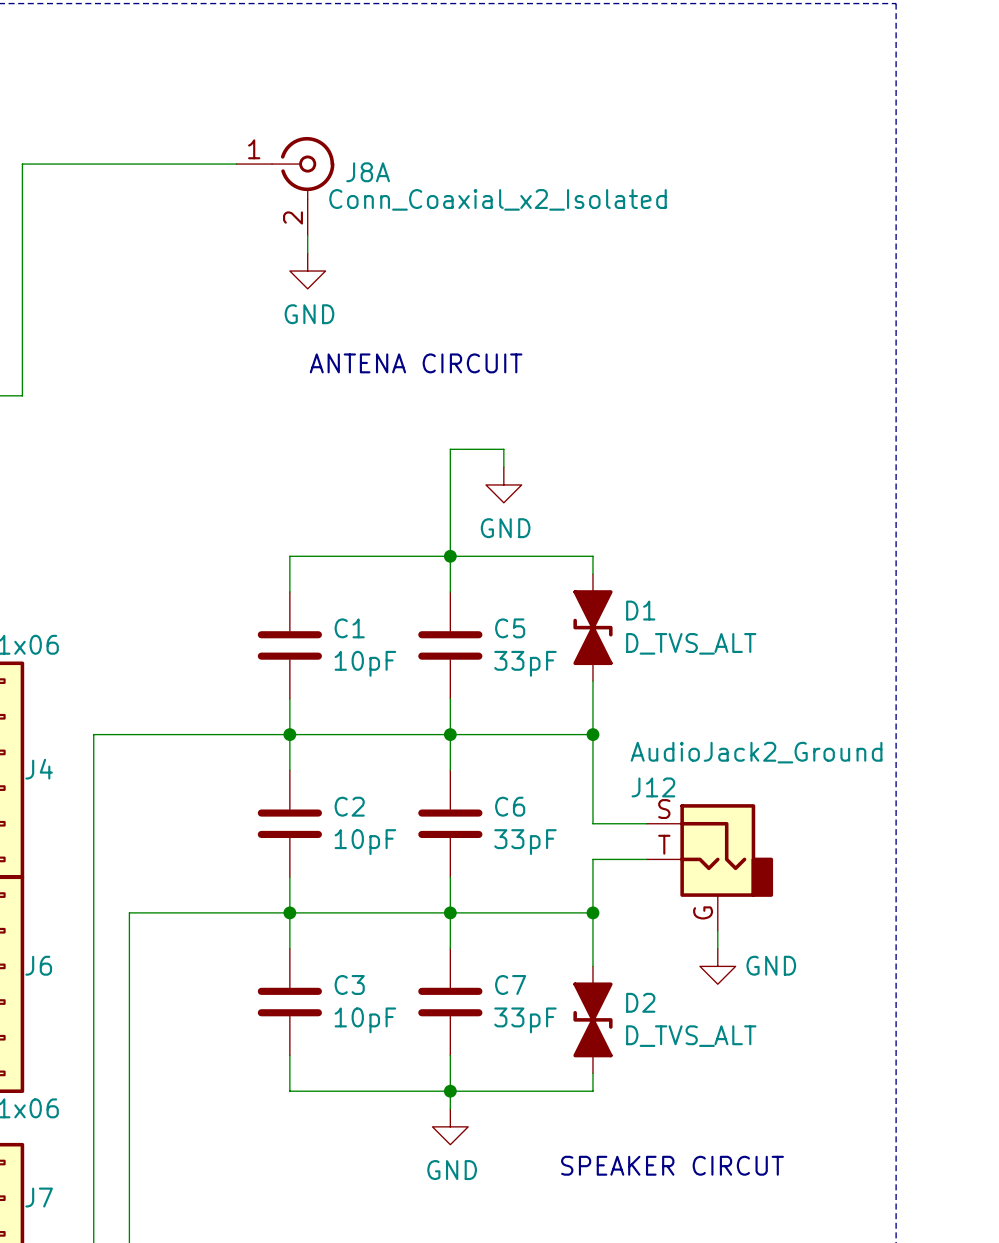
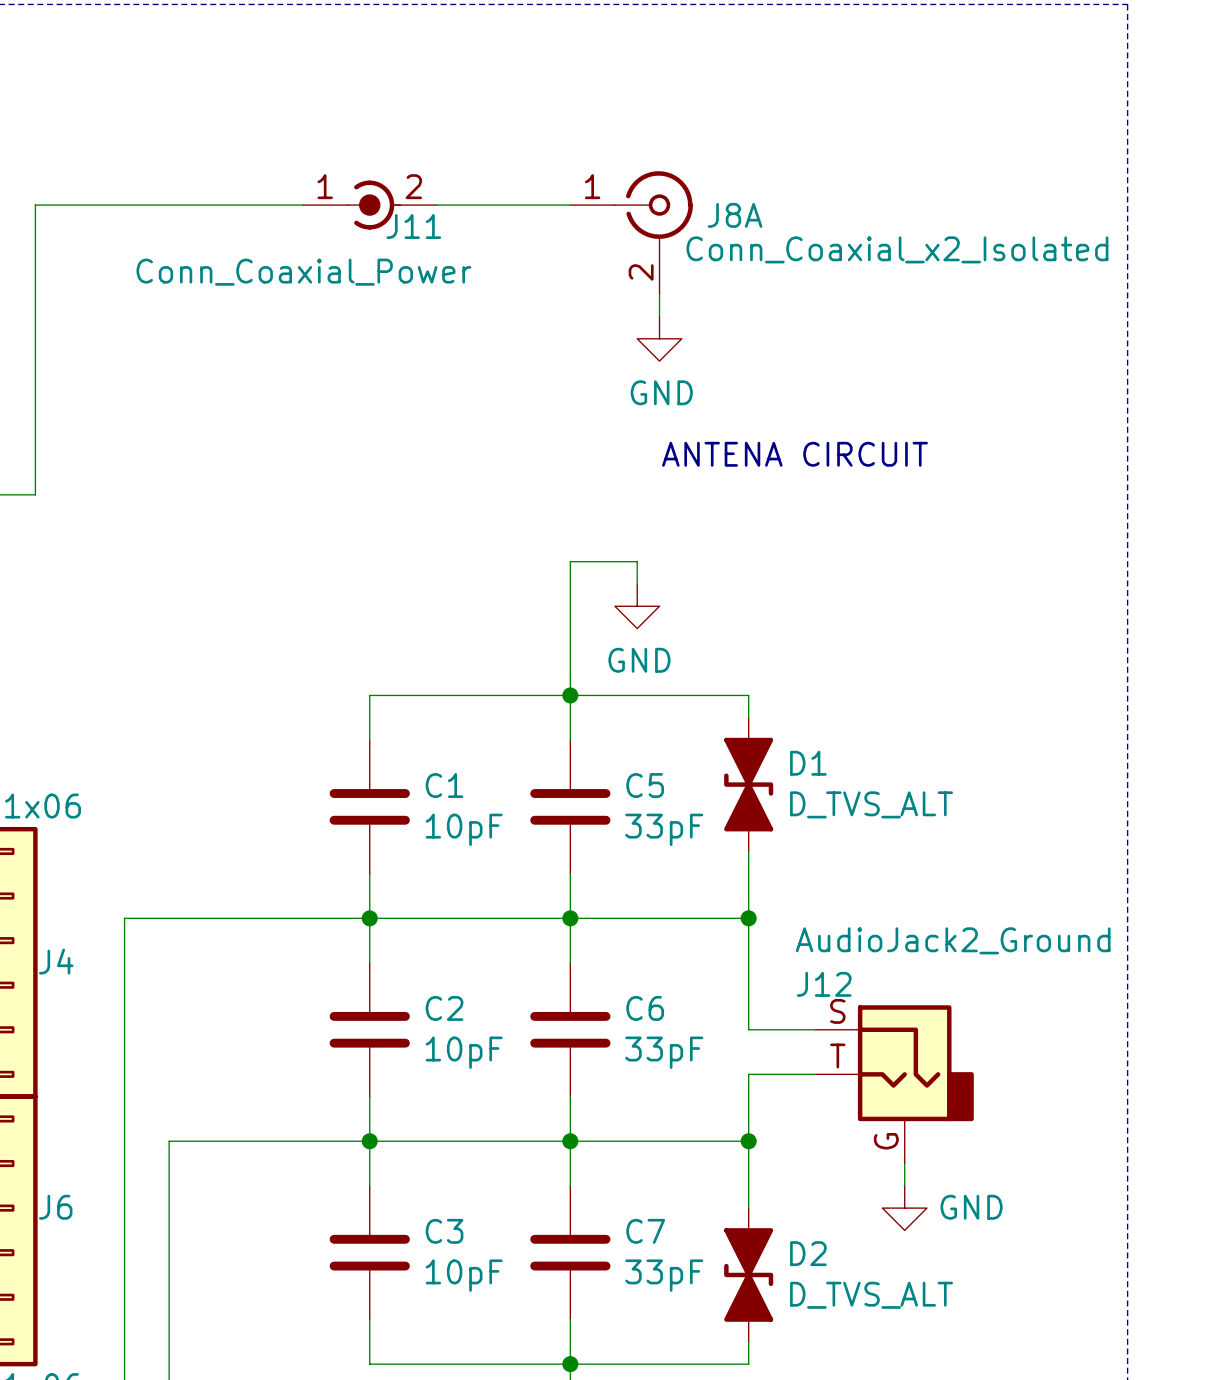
J11: none -> Conn_Coaxial_Power (369, 205)
wire: none -> (436, 205) (570, 205)
J8A position: (285, 186) -> (631, 232)
wire: (307, 235) (307, 253) -> (659, 294) (659, 316)
power symbol position: GND (307, 271) -> GND (659, 338)
text position: ANTENA CIRCUIT (416, 363) -> ANTENA CIRCUIT (795, 454)

